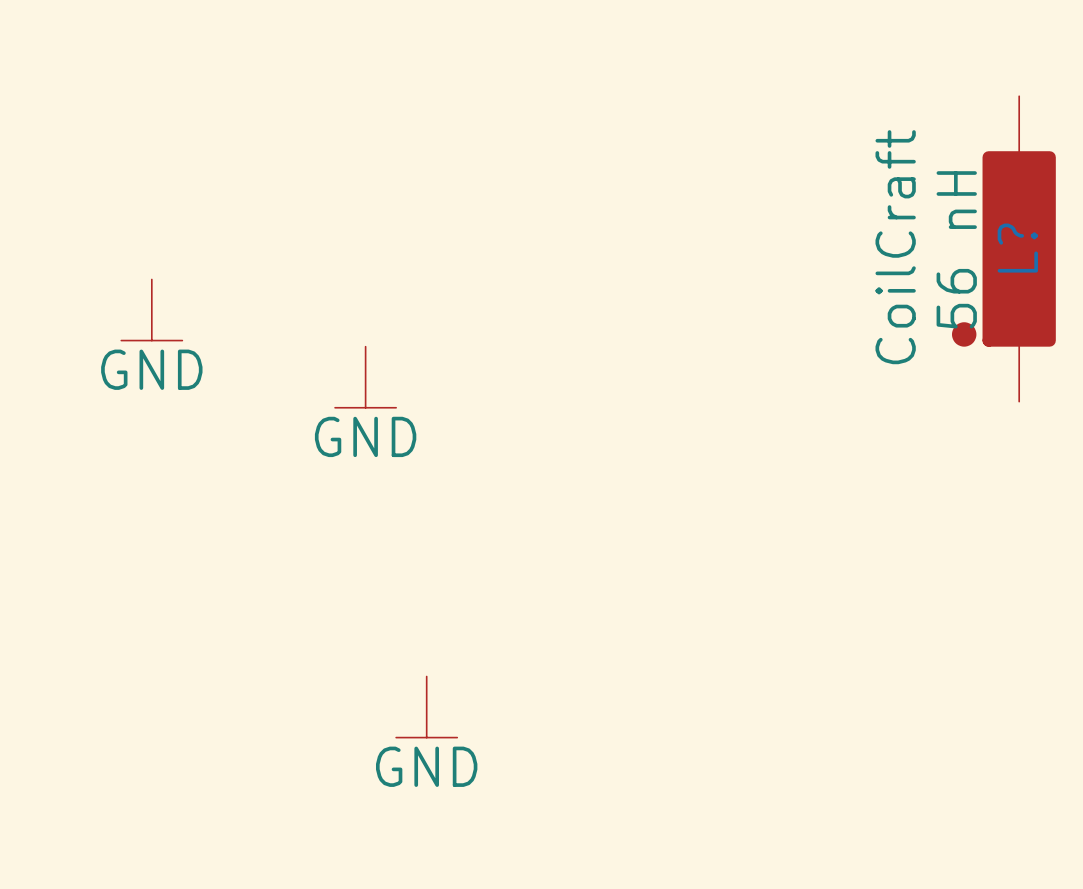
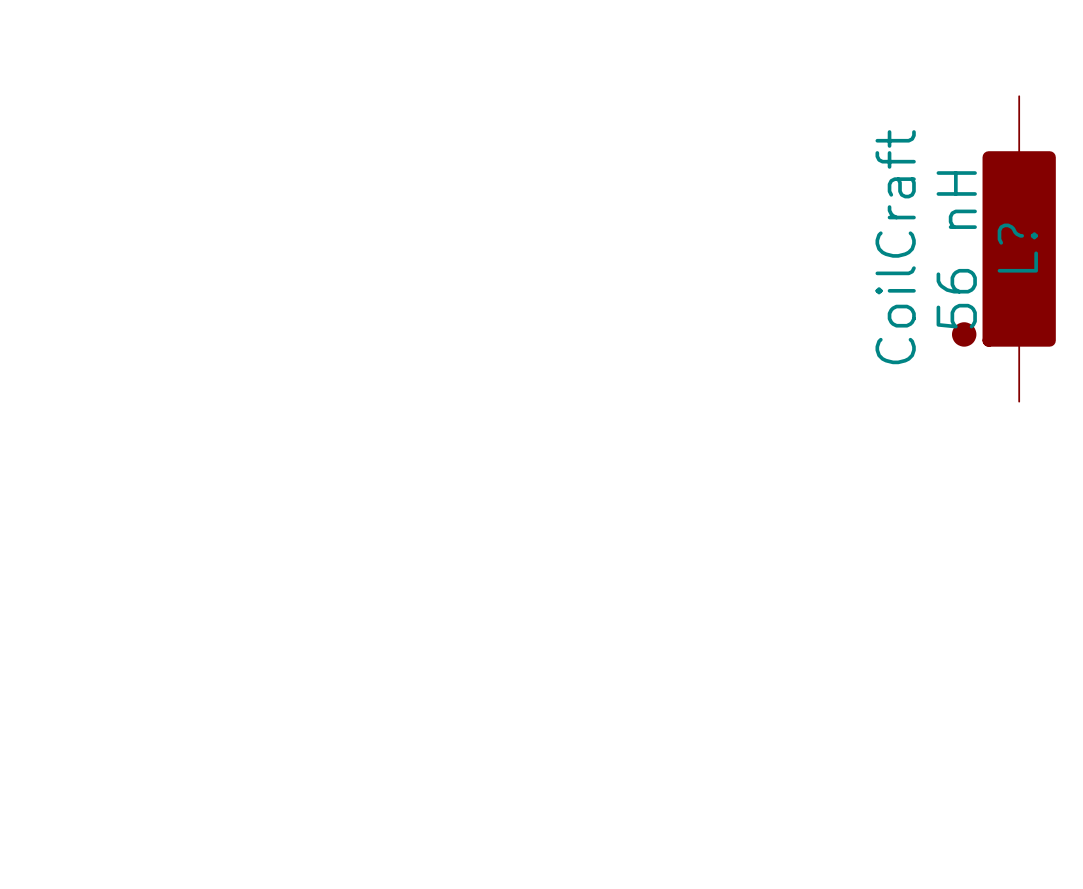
power symbol: GND (151, 310) -> none
power symbol: GND (365, 377) -> none
power symbol: GND (426, 707) -> none

